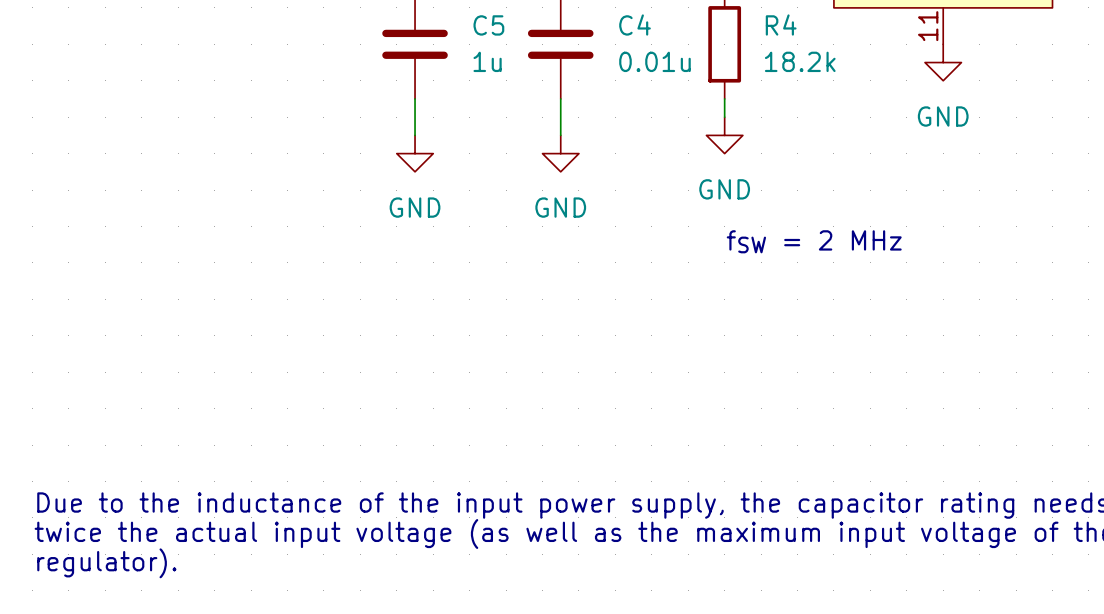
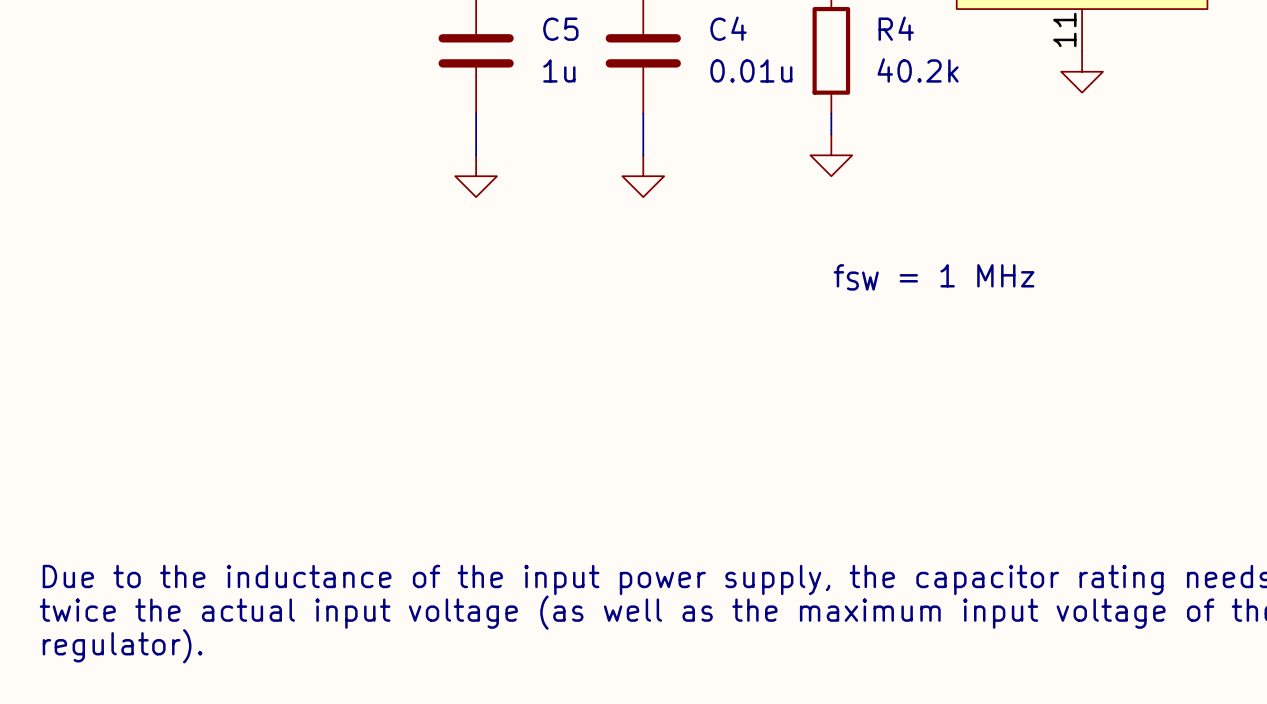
R4 value: 18.2k (800, 61) -> 40.2k (918, 70)
power symbol text: GND (943, 116) -> none
power symbol text: GND (724, 189) -> none
power symbol text: GND (415, 207) -> none
power symbol text: GND (560, 207) -> none
text: fSW = 2 MHz (814, 241) -> fSW = 1 MHz (934, 277)

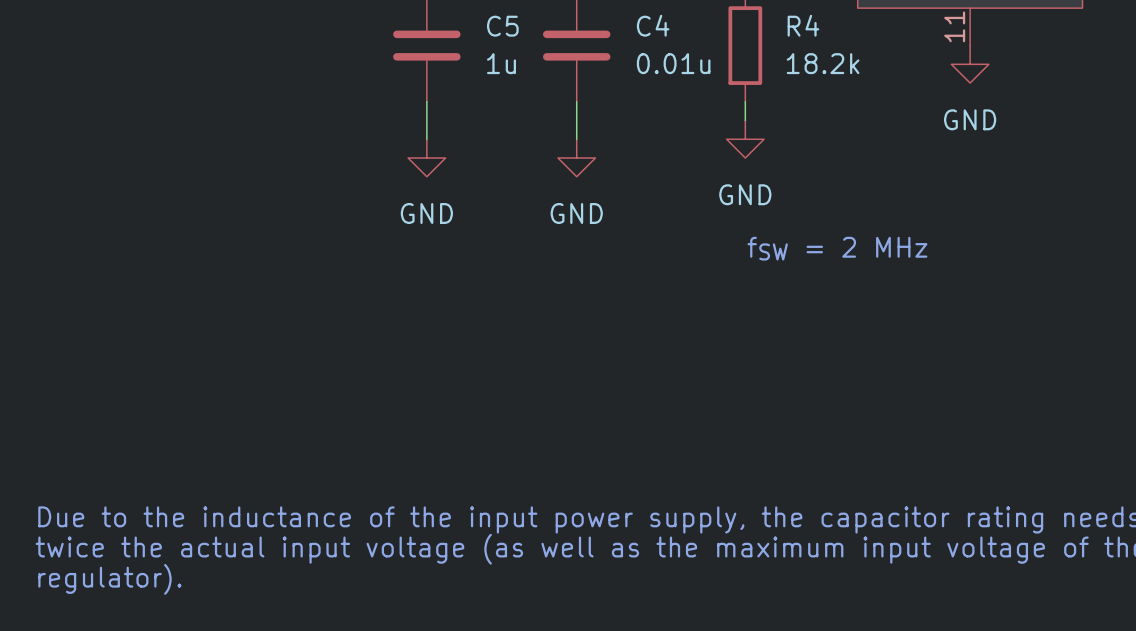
R4 value: 40.2k (918, 70) -> 18.2k (823, 63)
power symbol text: none -> GND (970, 119)
power symbol text: none -> GND (745, 194)
power symbol text: none -> GND (426, 213)
power symbol text: none -> GND (576, 213)
text: fSW = 1 MHz (934, 277) -> fSW = 2 MHz (837, 248)

